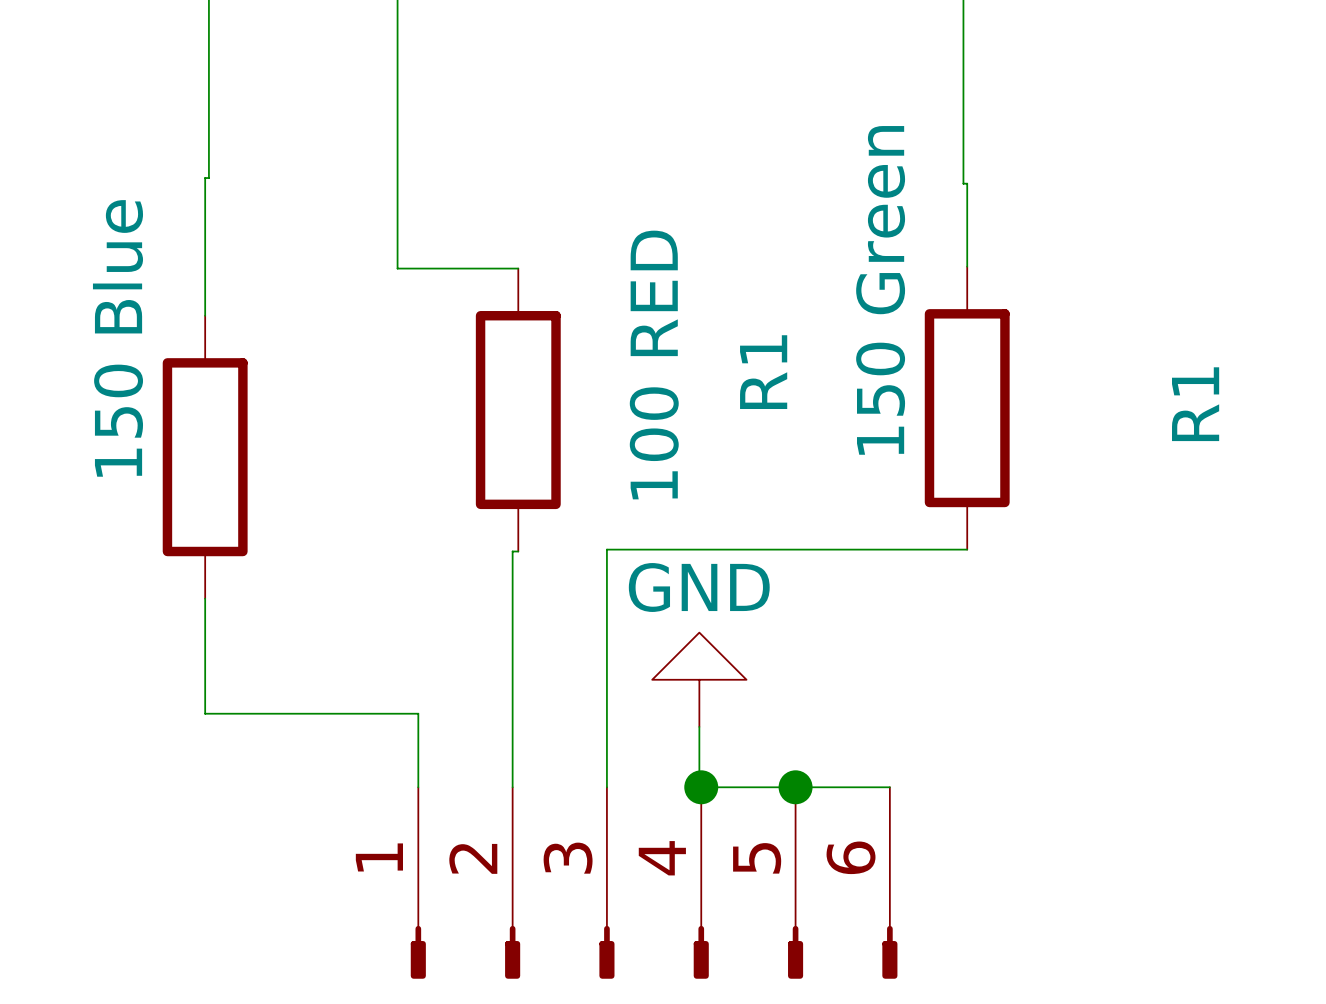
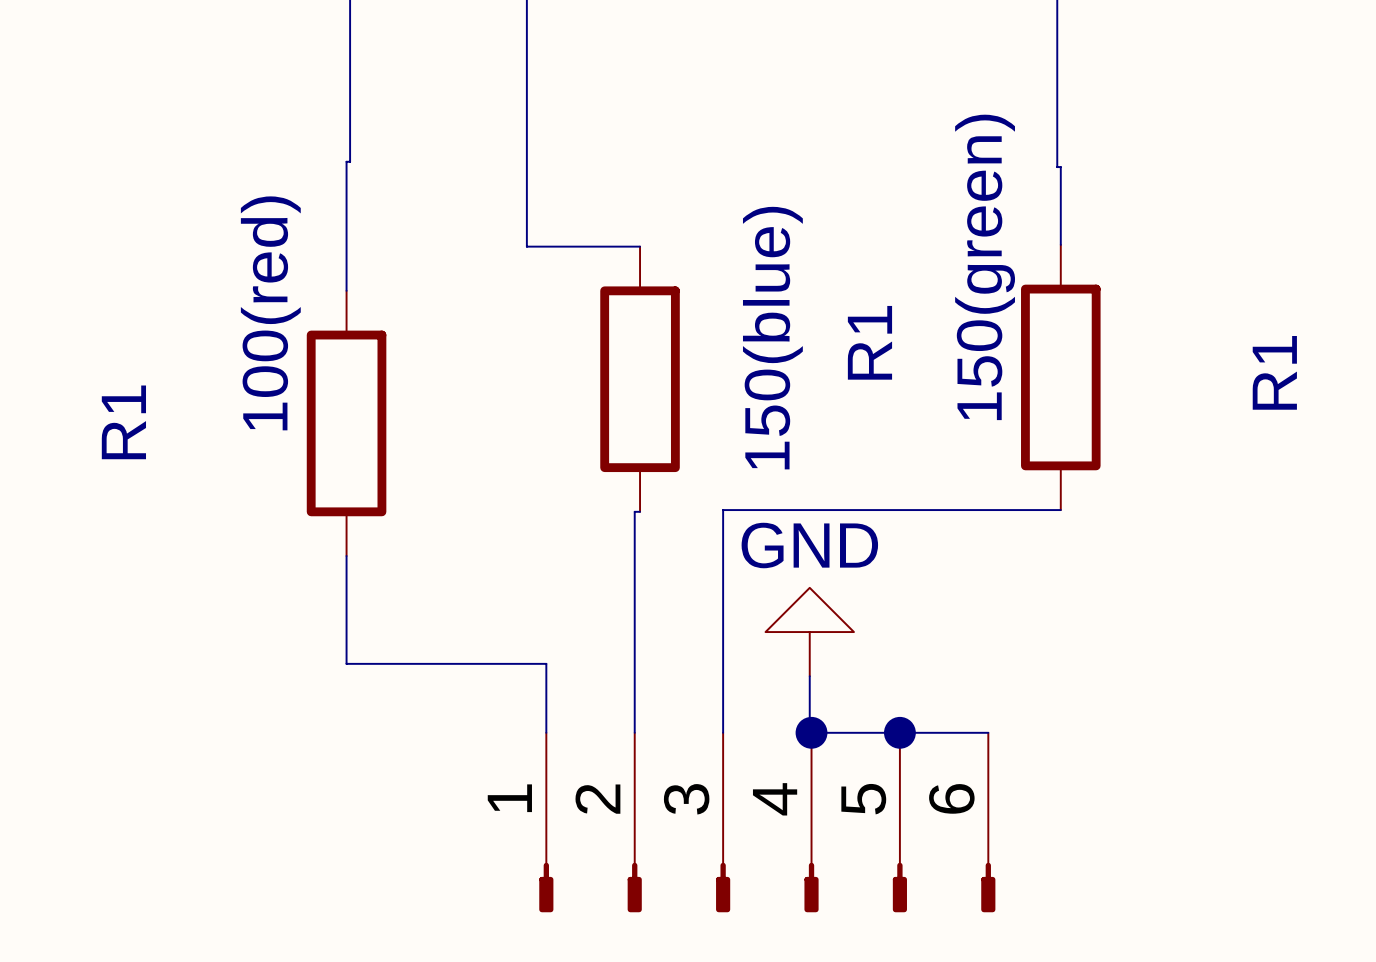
R1 value: 150 Green (880, 290) -> 150(green) (985, 267)
R1 value: 150 Blue (117, 338) -> 100(red) (270, 313)
R1 value: 100 RED (654, 365) -> 150(blue) (772, 338)

